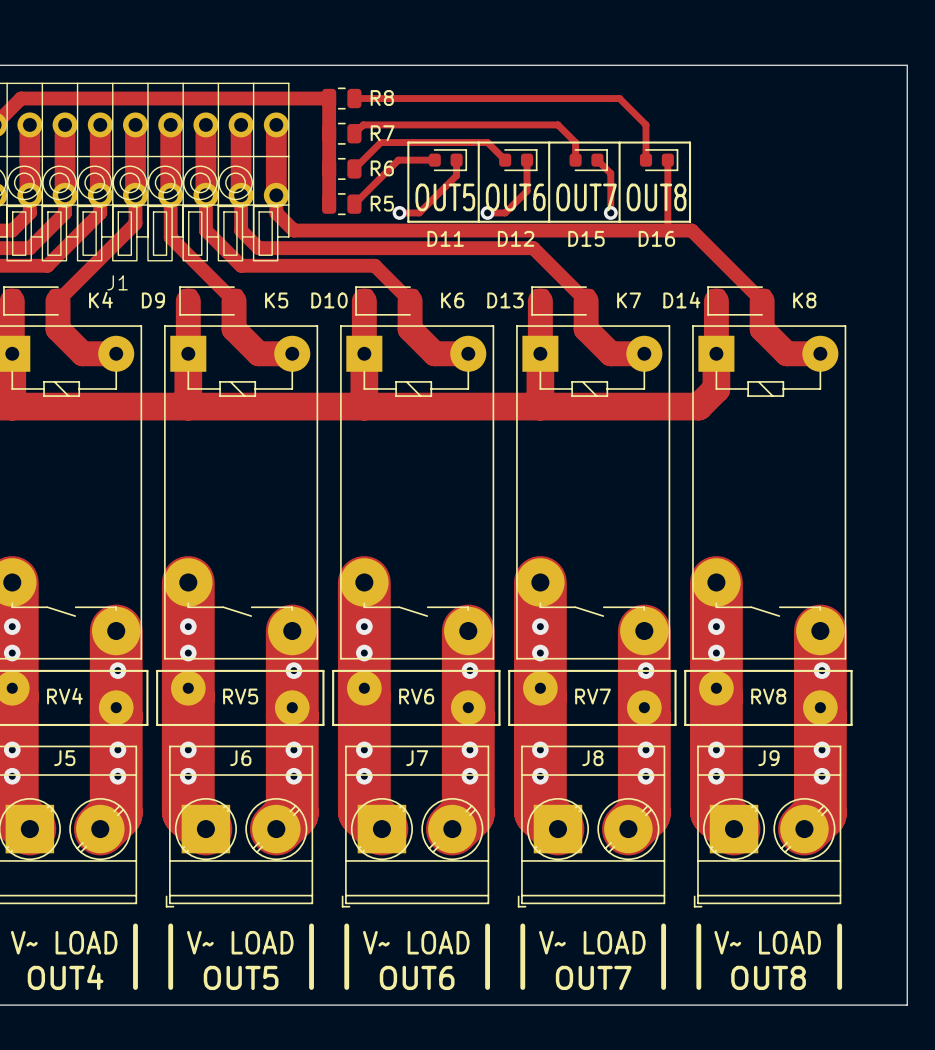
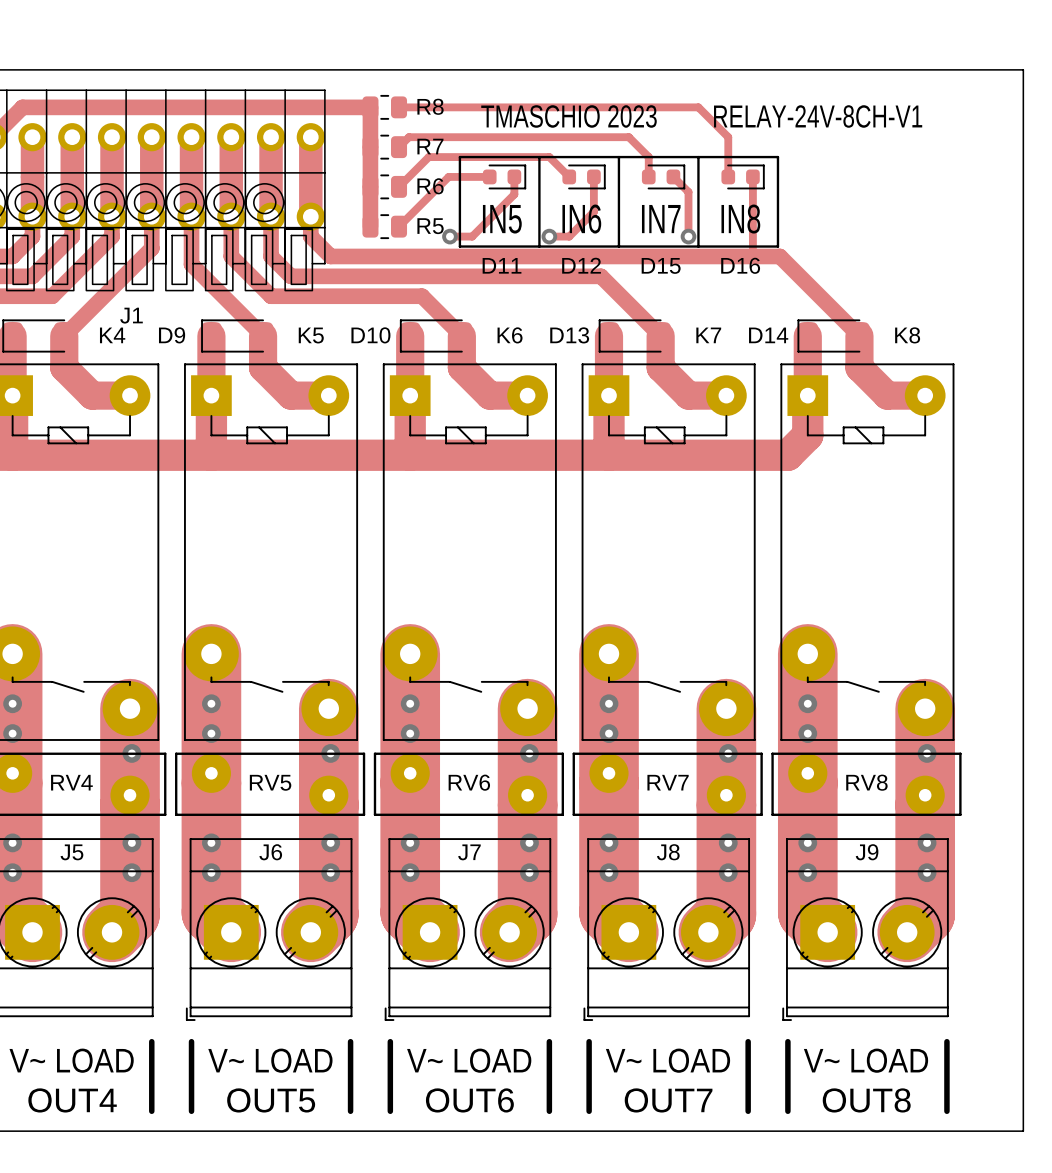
text: none -> TMASCHIO 2023 (568, 116)
text: none -> RELAY-24V-8CH-V1 (818, 116)
text: OUT5 (445, 197) -> IN5 (502, 219)
text: OUT6 (515, 197) -> IN6 (581, 219)
text: OUT7 (586, 197) -> IN7 (661, 219)
text: OUT8 (656, 197) -> IN8 (740, 219)

